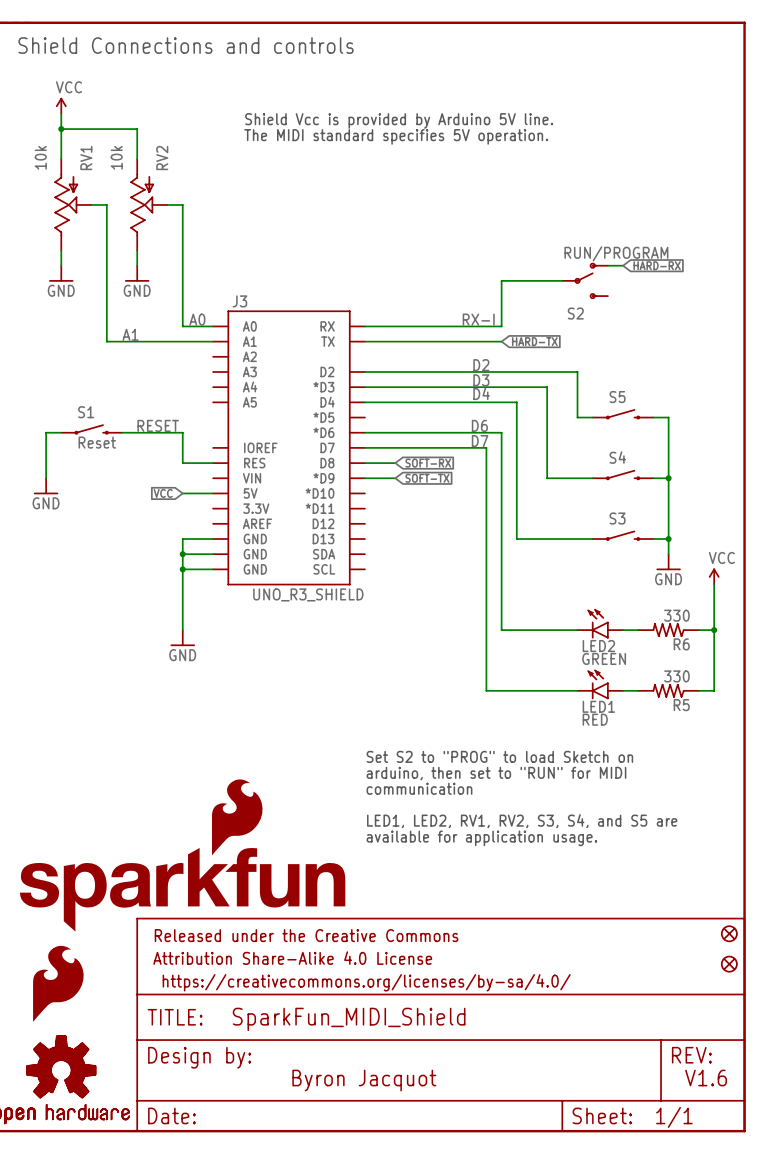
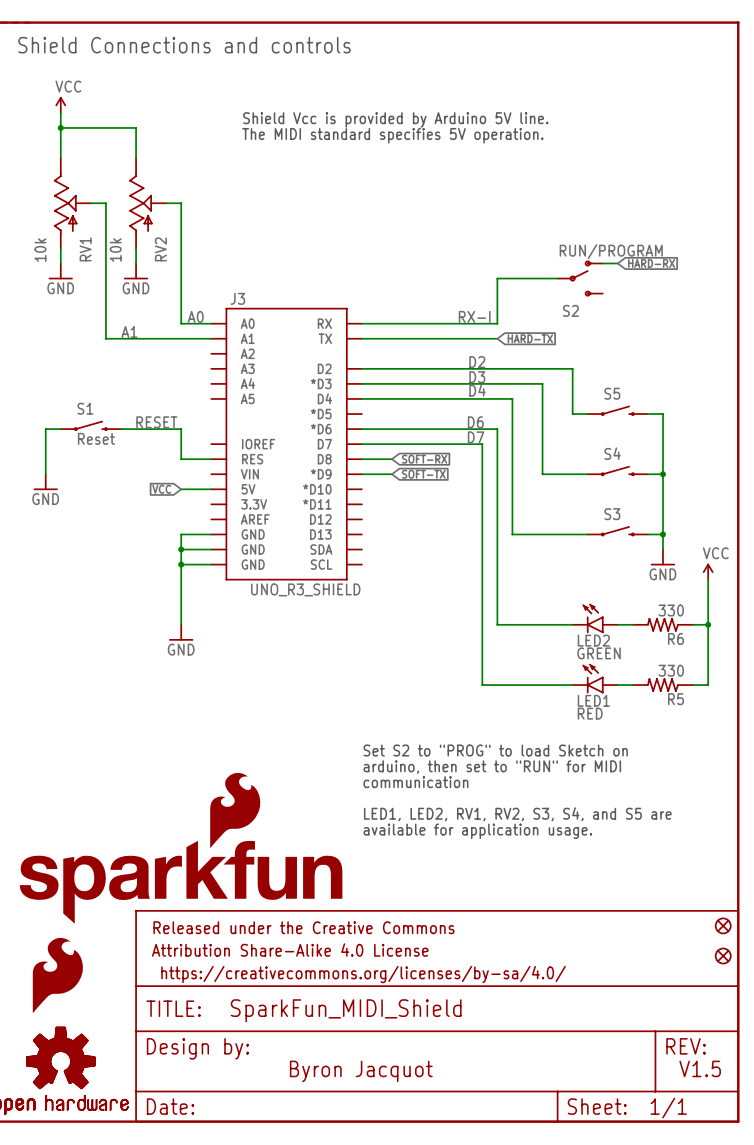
RV1 flip: as is (66, 204) -> up-down (65, 203)
RV2 flip: as is (141, 204) -> up-down (140, 203)
text: V1.6 (706, 1078) -> V1.5 (700, 1068)

